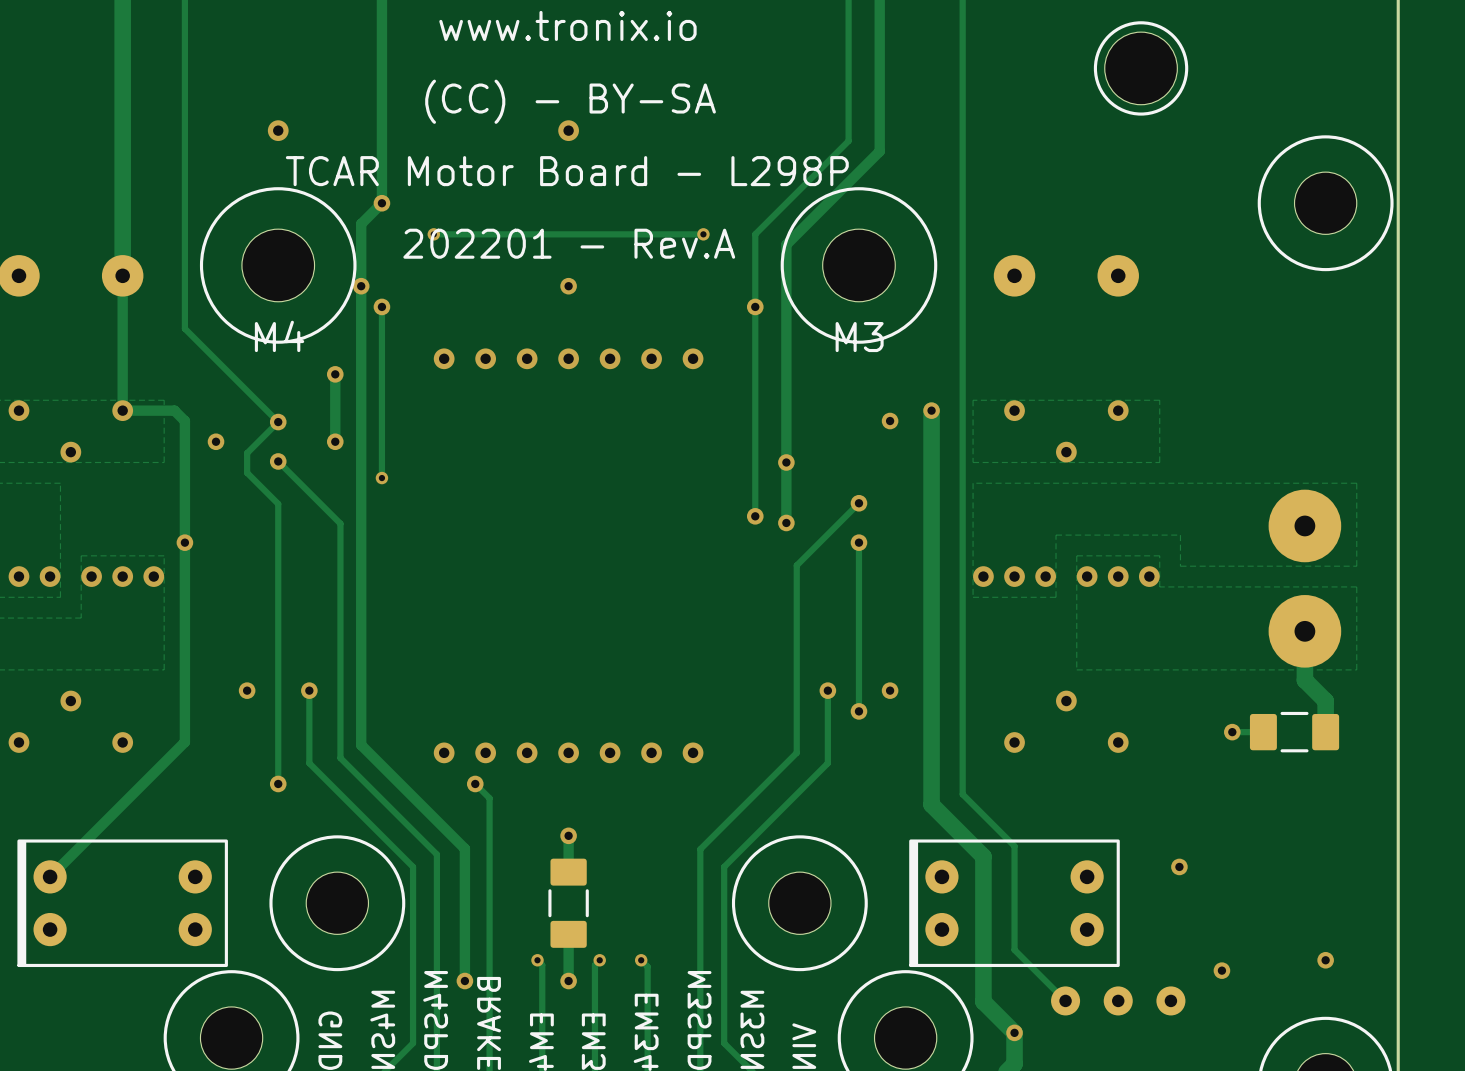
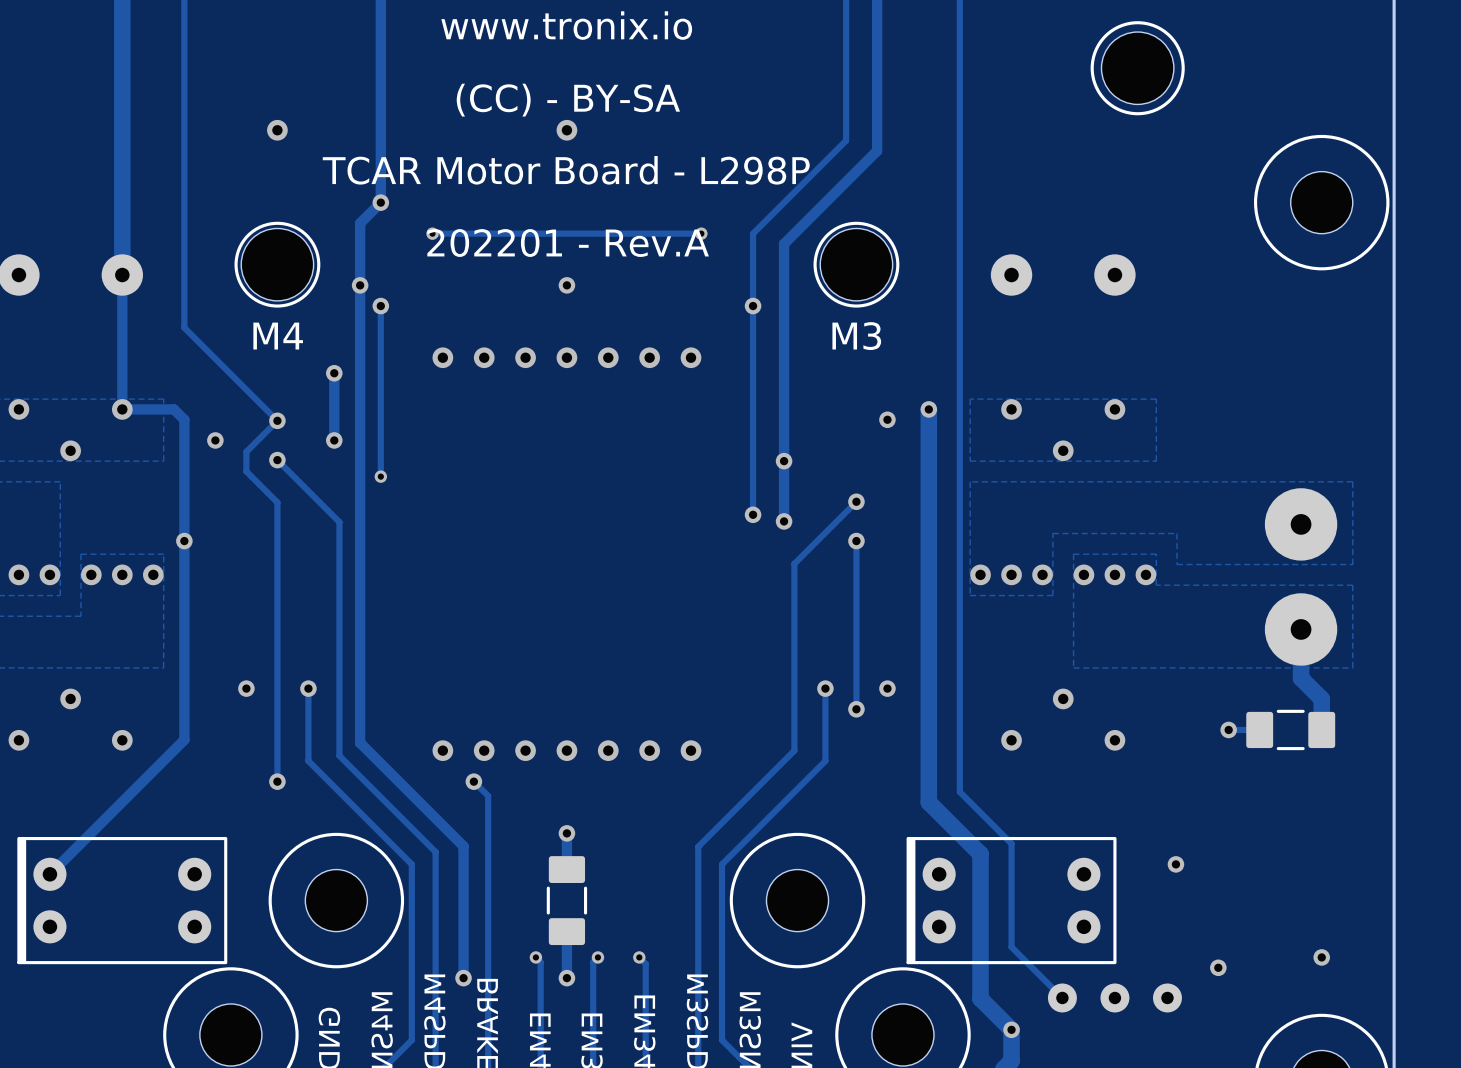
part footprint: [199, 187, 357, 344] -> [234, 221, 321, 308]
part footprint: [780, 187, 938, 344] -> [813, 221, 900, 308]

